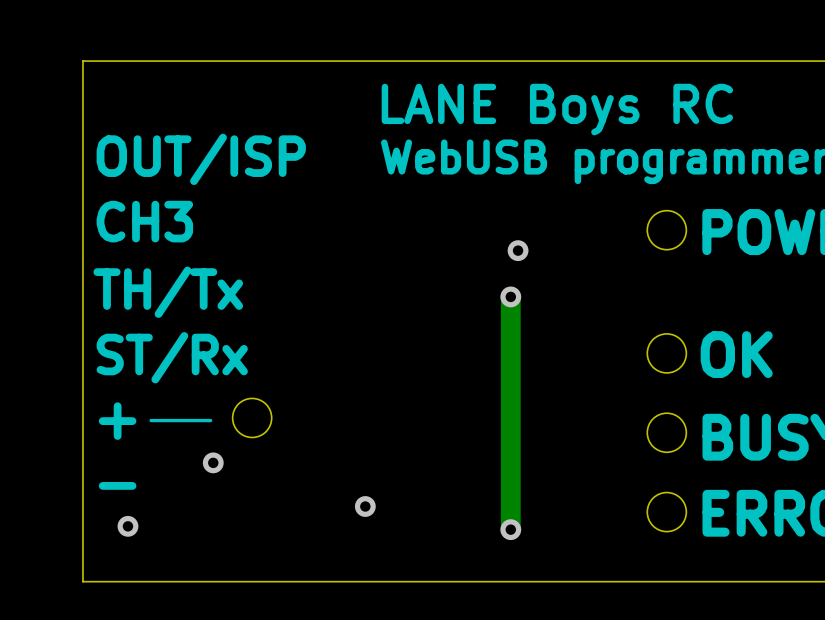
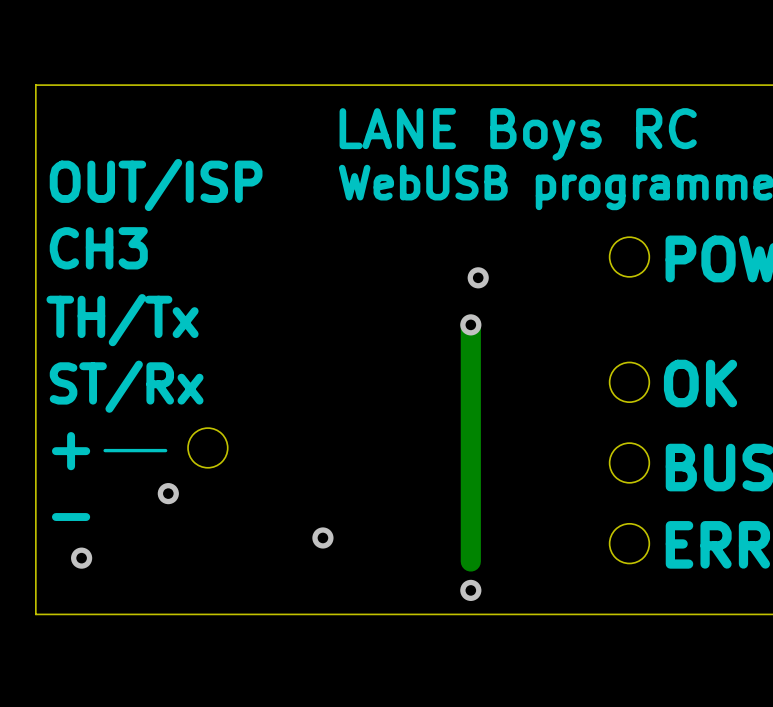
via position: (510, 529) -> (470, 590)

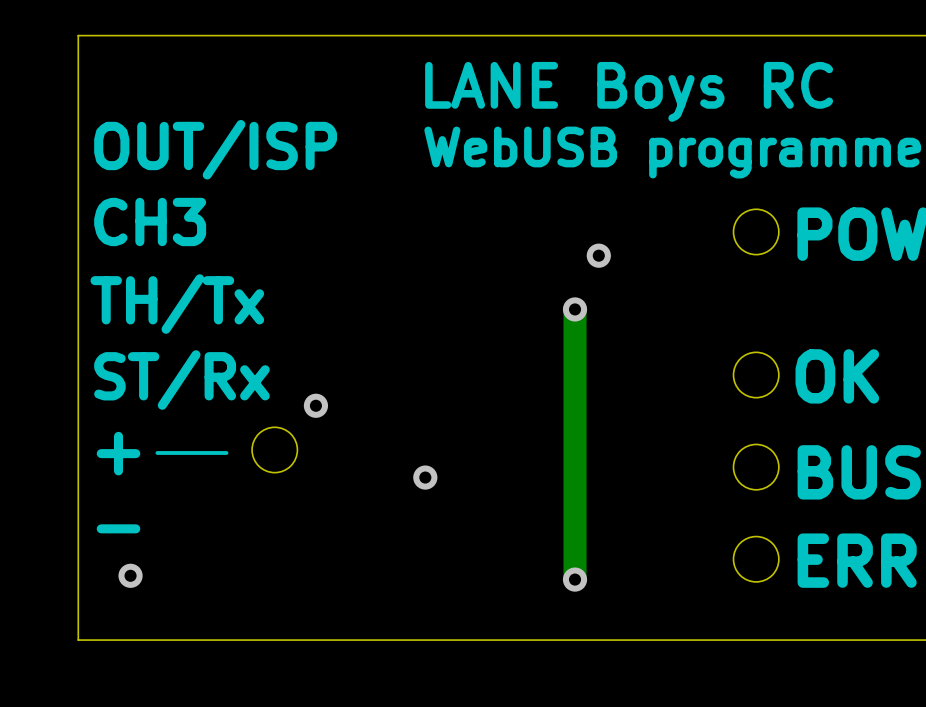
via position: (478, 277) -> (598, 255)
via: none -> (315, 405)
via: (168, 493) -> none
via position: (322, 537) -> (425, 477)
via position: (470, 590) -> (575, 579)

